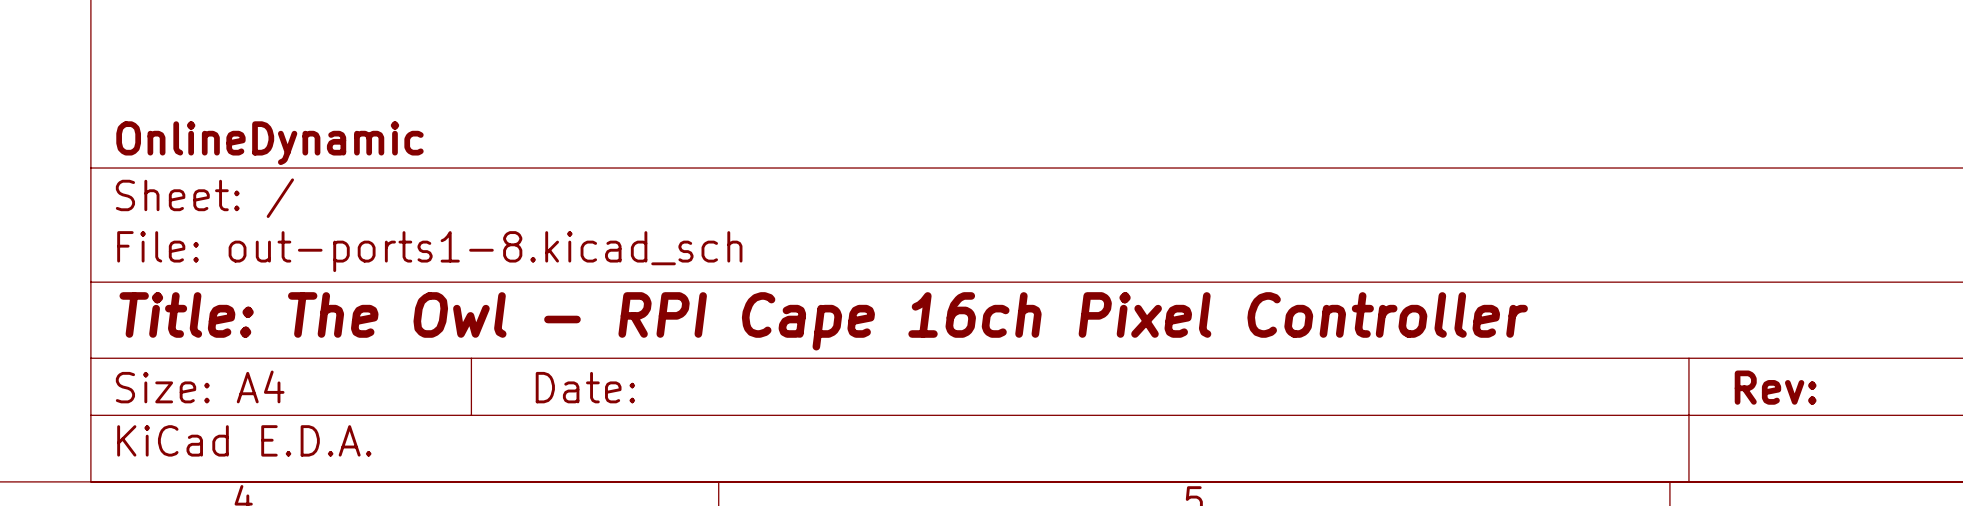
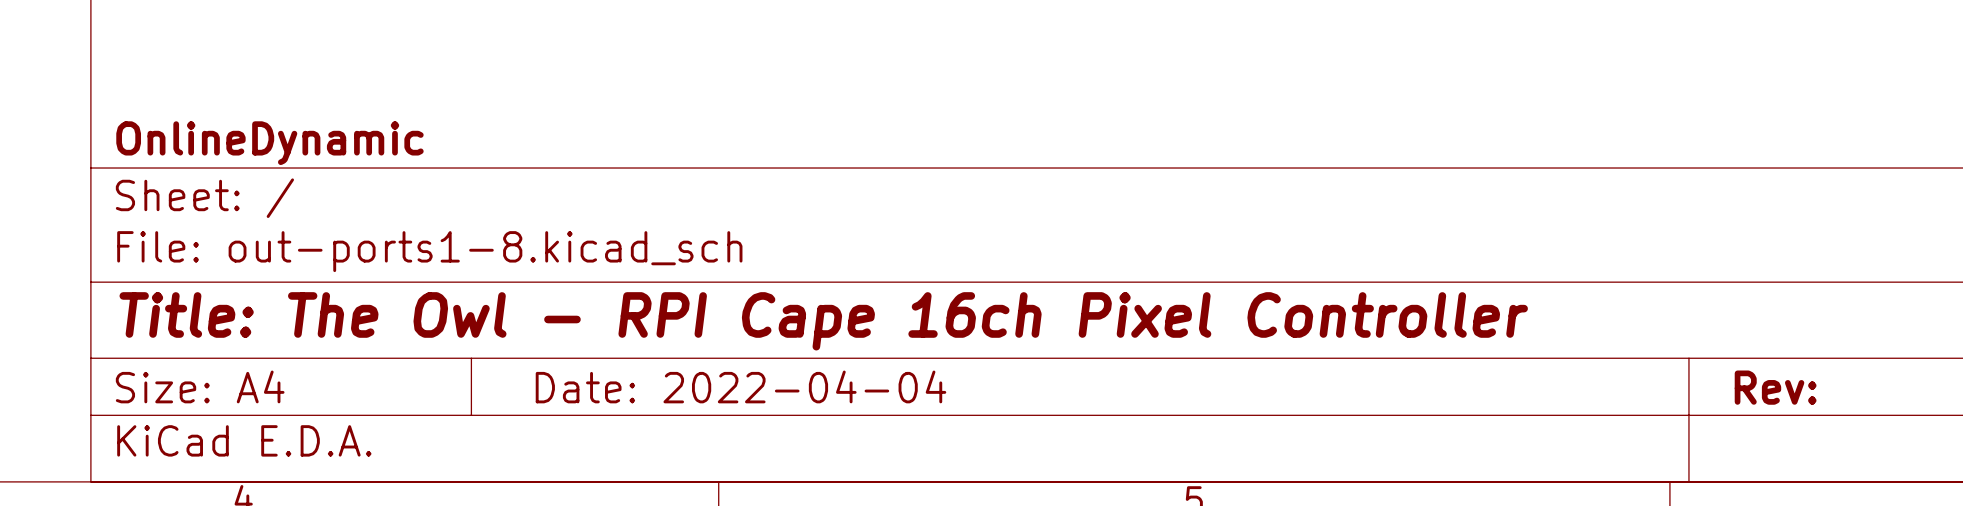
title block: Date: (585, 387) -> Date: 2022-04-04 (741, 386)

